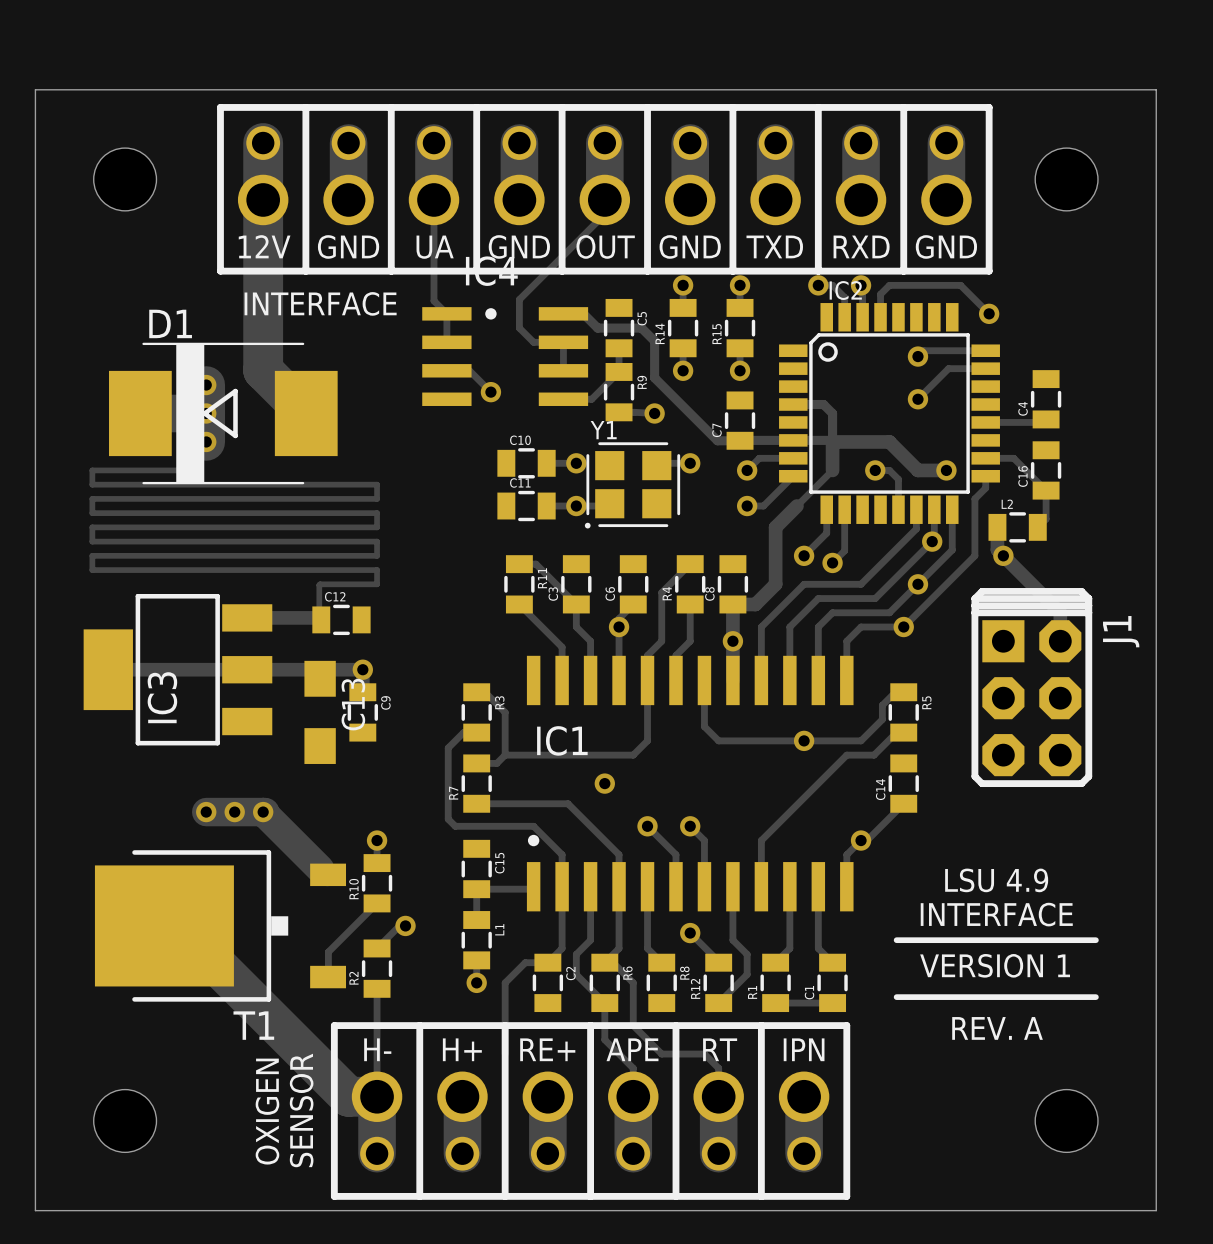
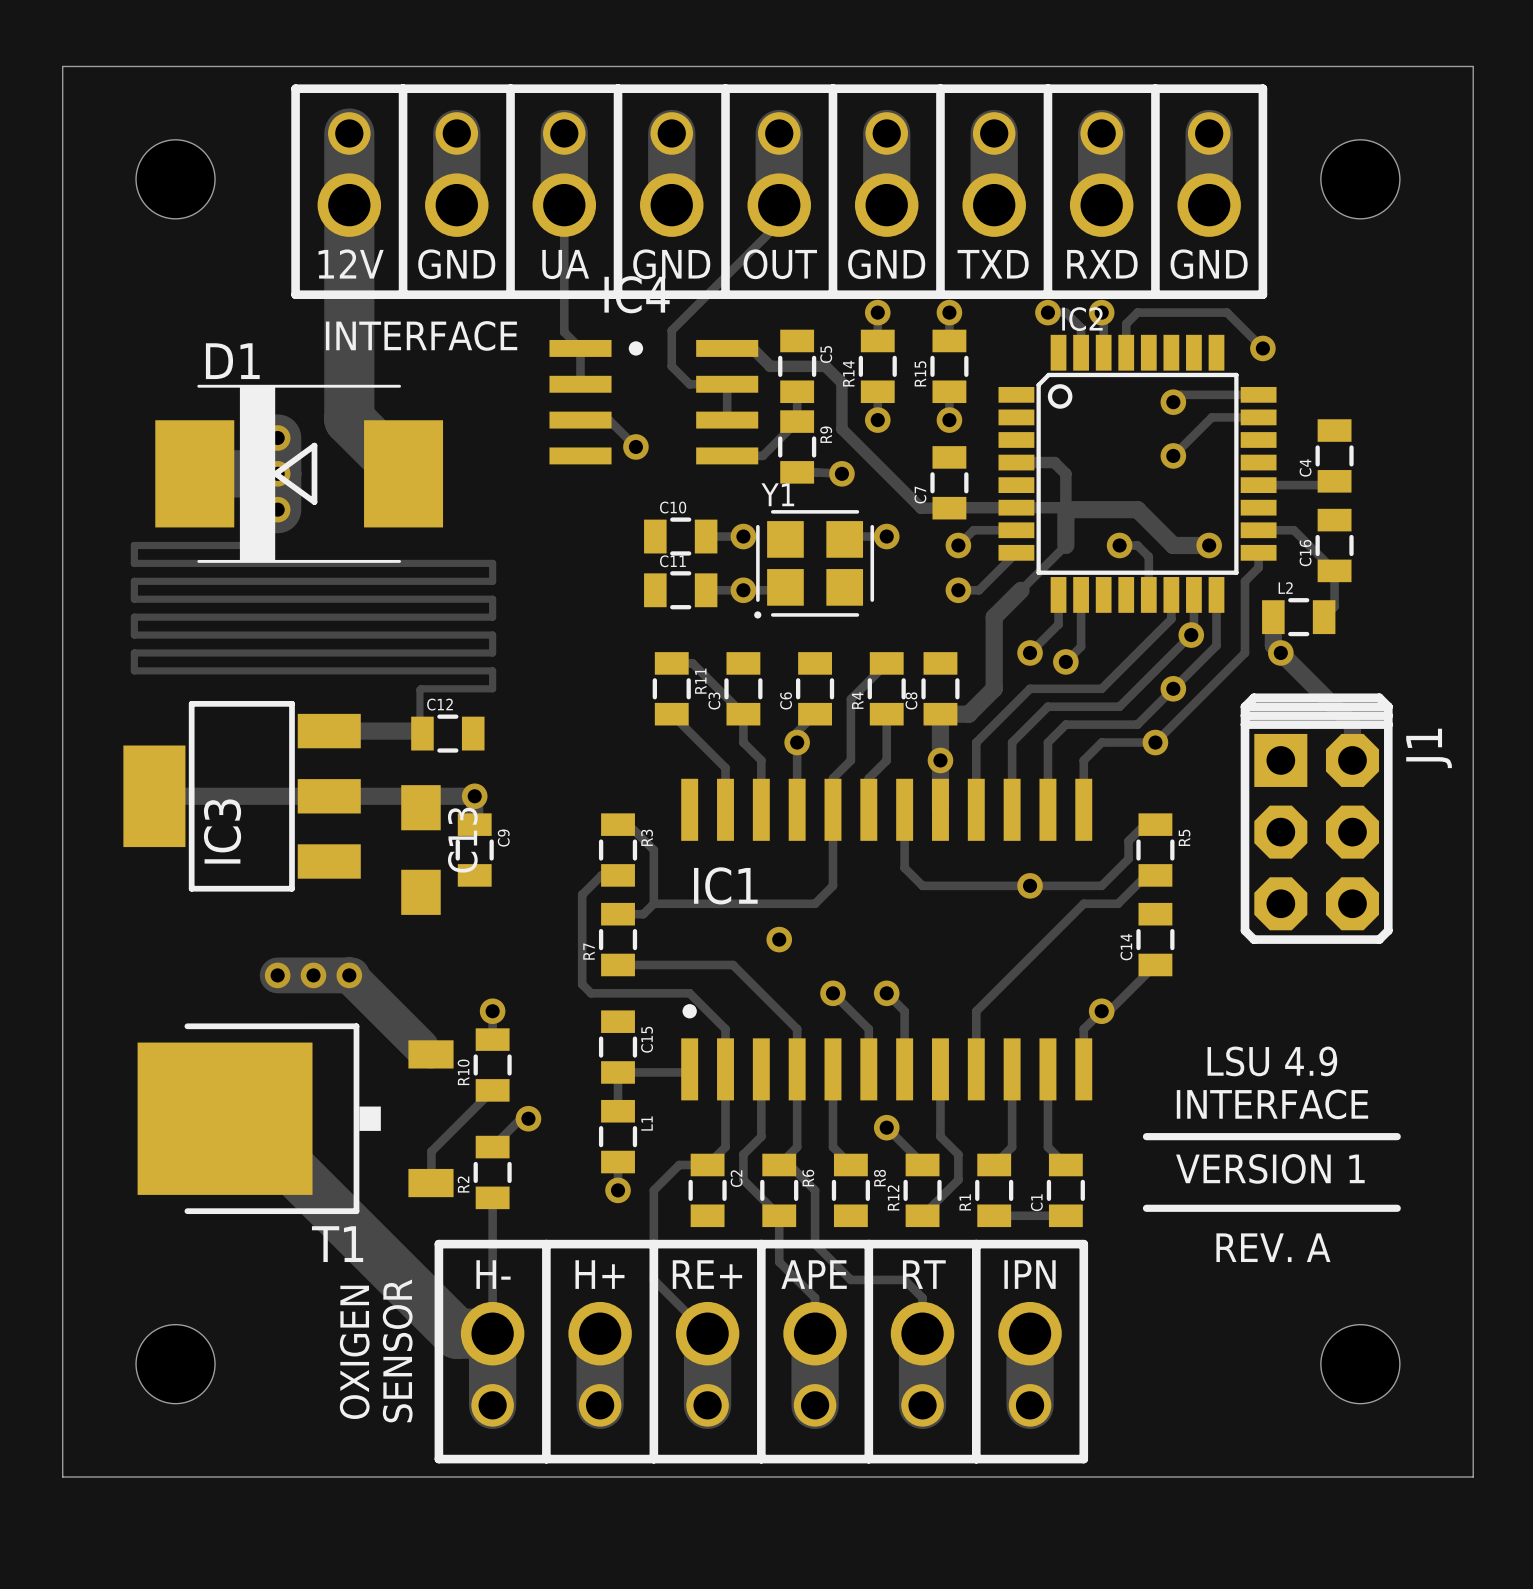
track: none -> (653, 1279) (707, 1333)

